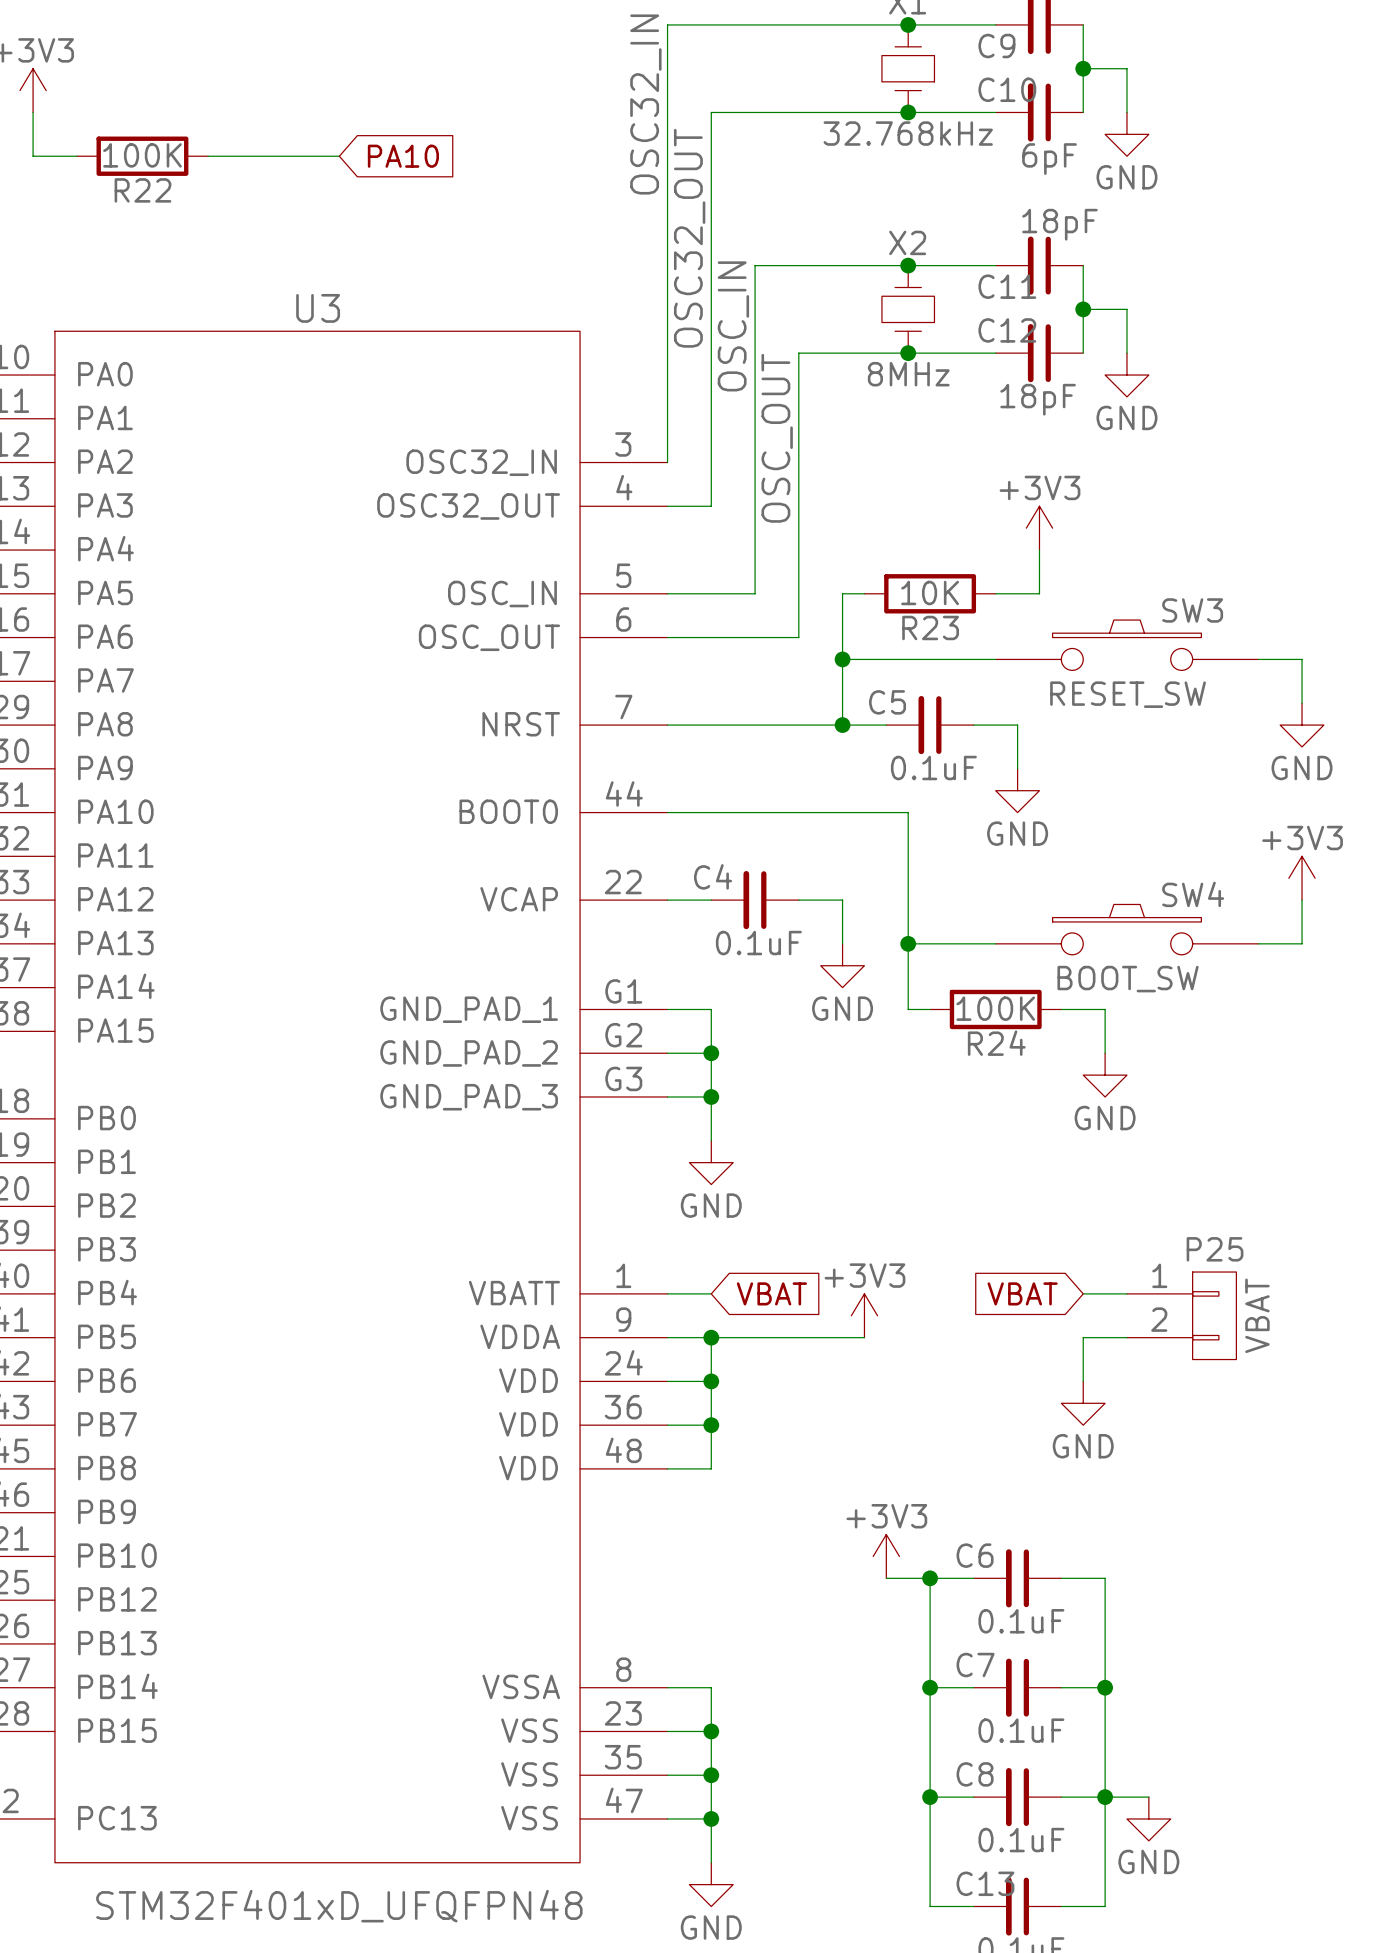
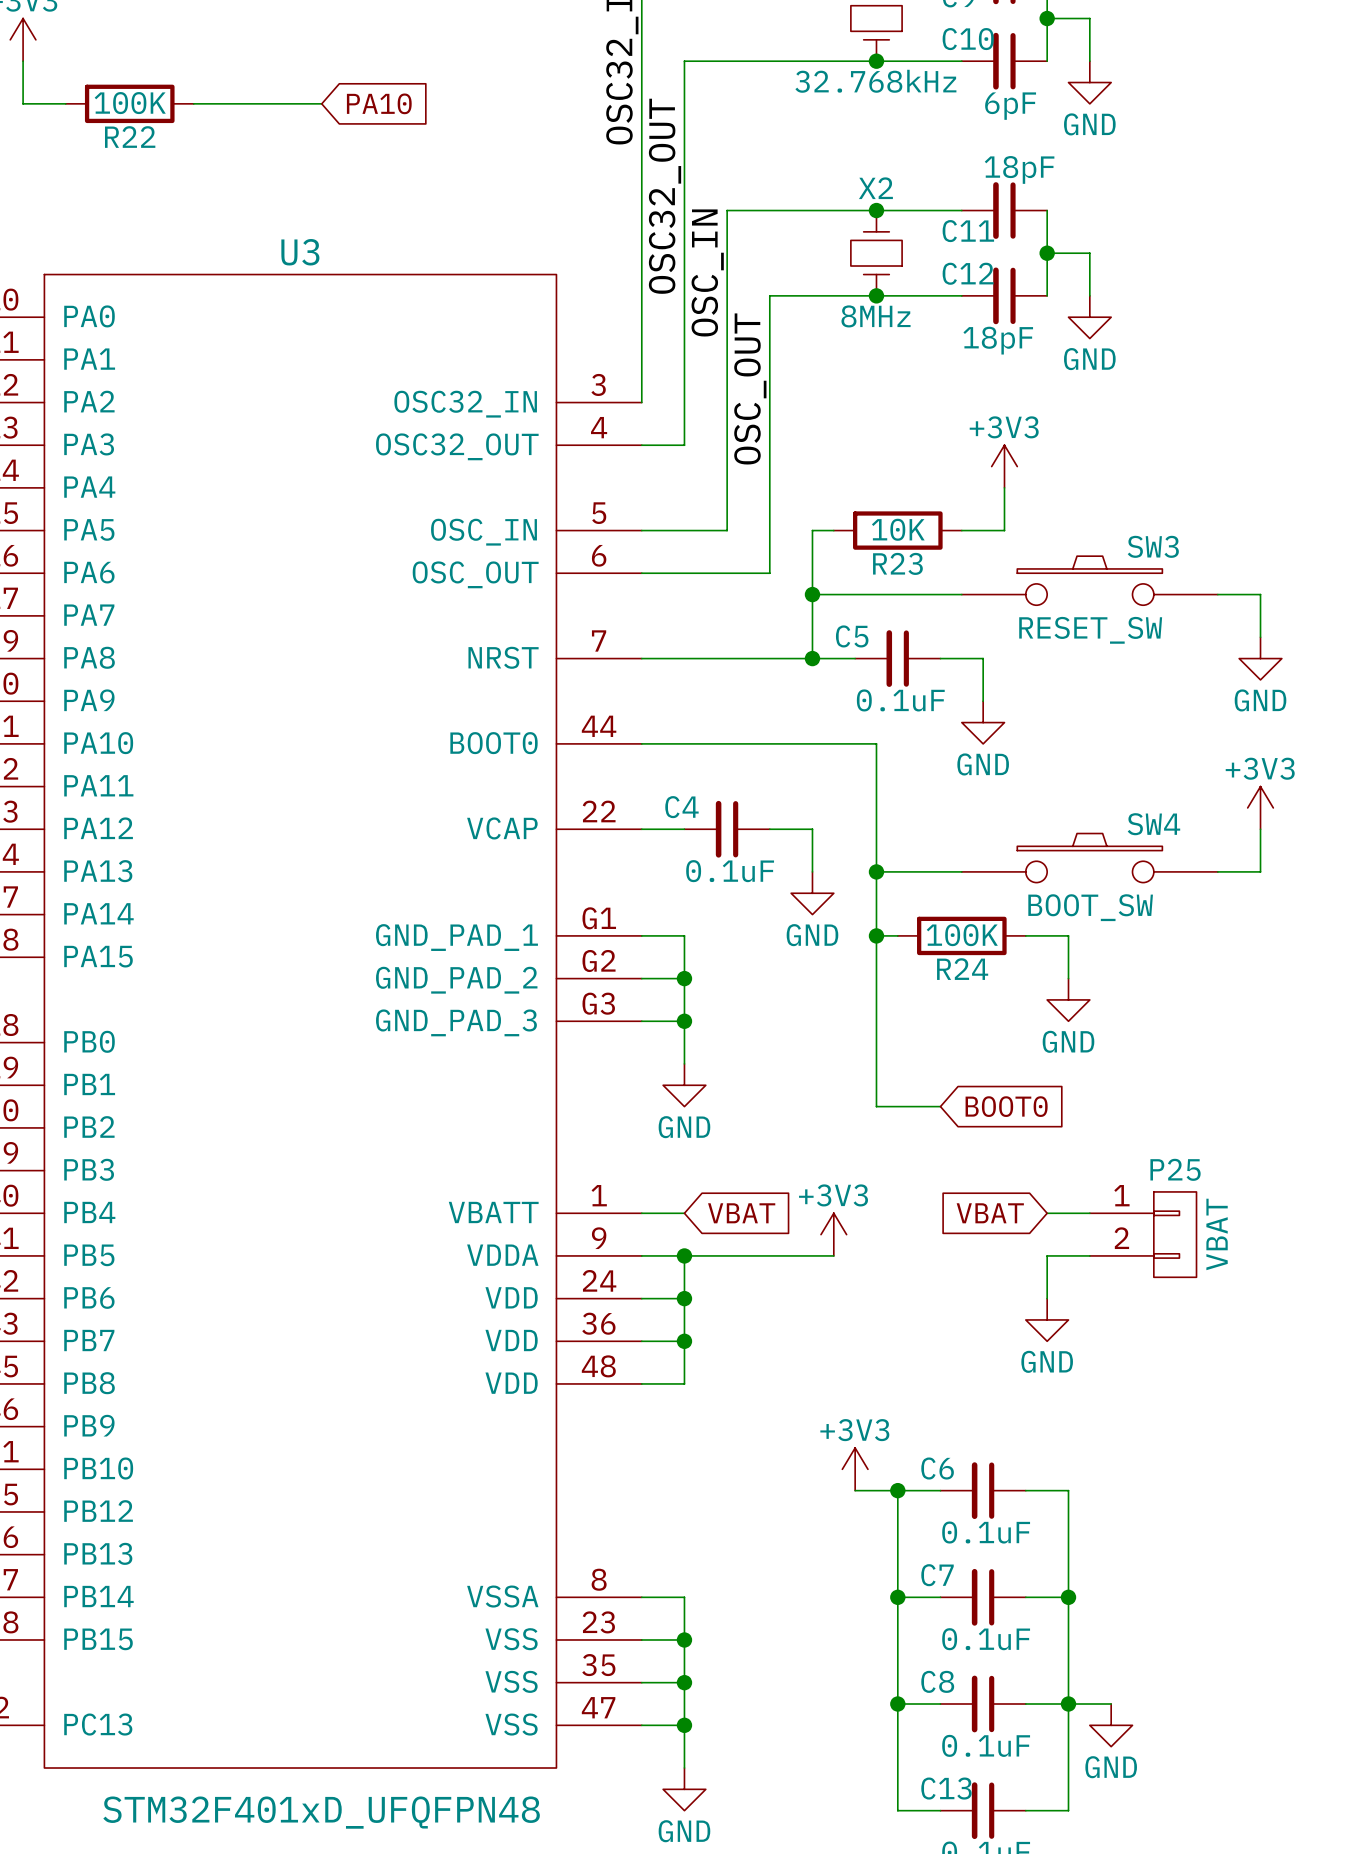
wire: none -> (876, 935) (876, 1106) (940, 1106)
junction: none -> (876, 935)
global label: none -> BOOT0 (1006, 1106)

